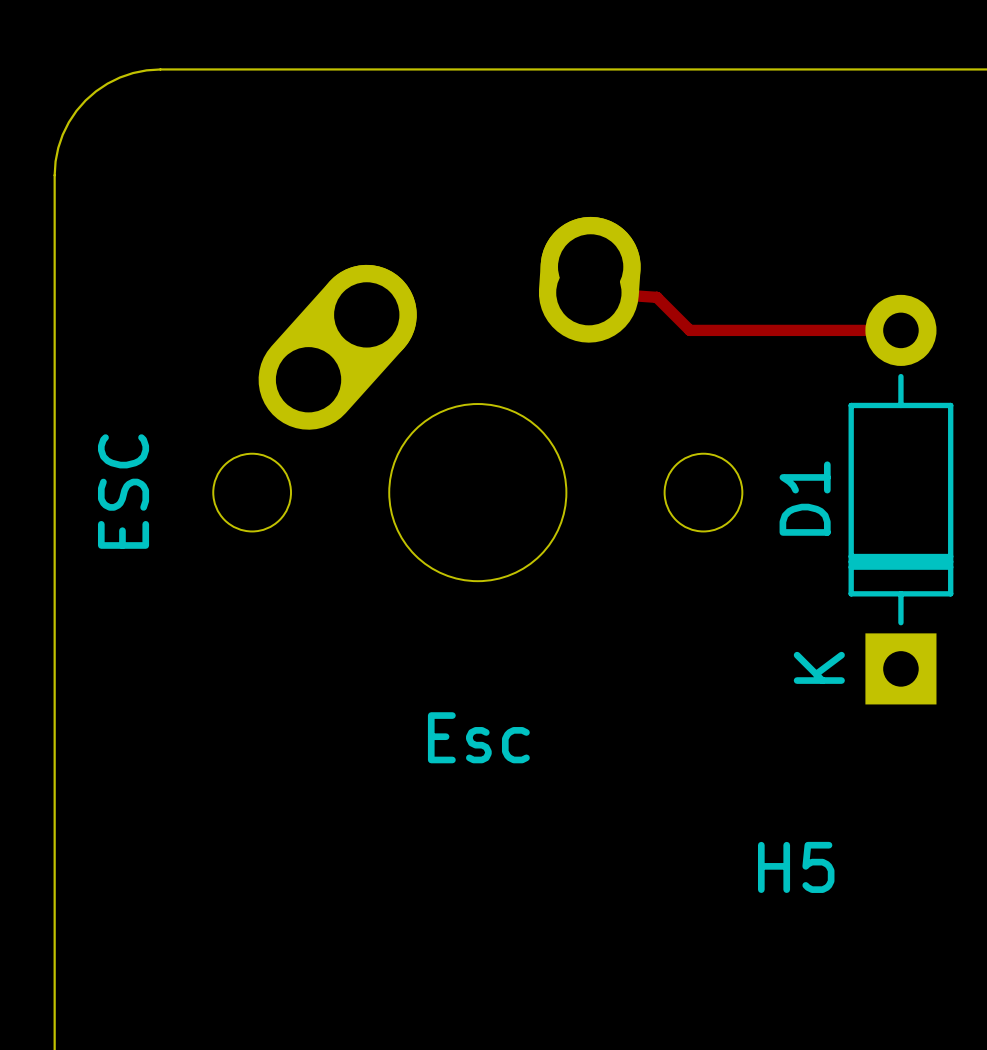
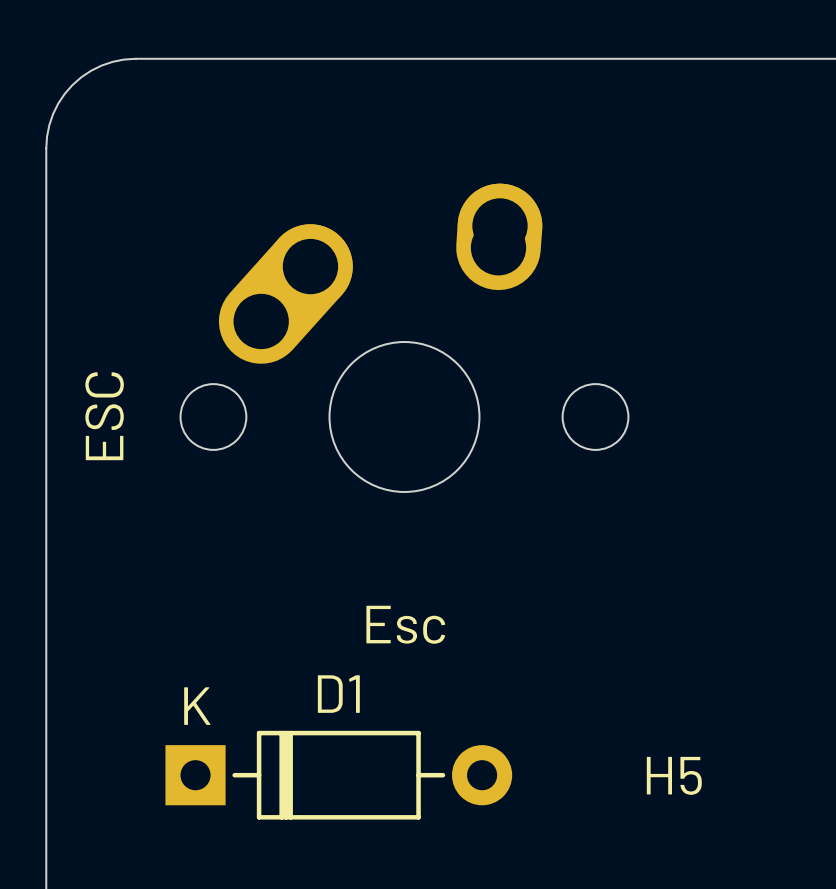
track: (588, 292) (656, 297) (689, 330) (900, 330) -> none
D1 rotation: 0° (900, 499) -> 90° clockwise (338, 775)
D1 position: (900, 499) -> (338, 775)
H5 name position: H5 (796, 867) -> H5 (674, 775)

